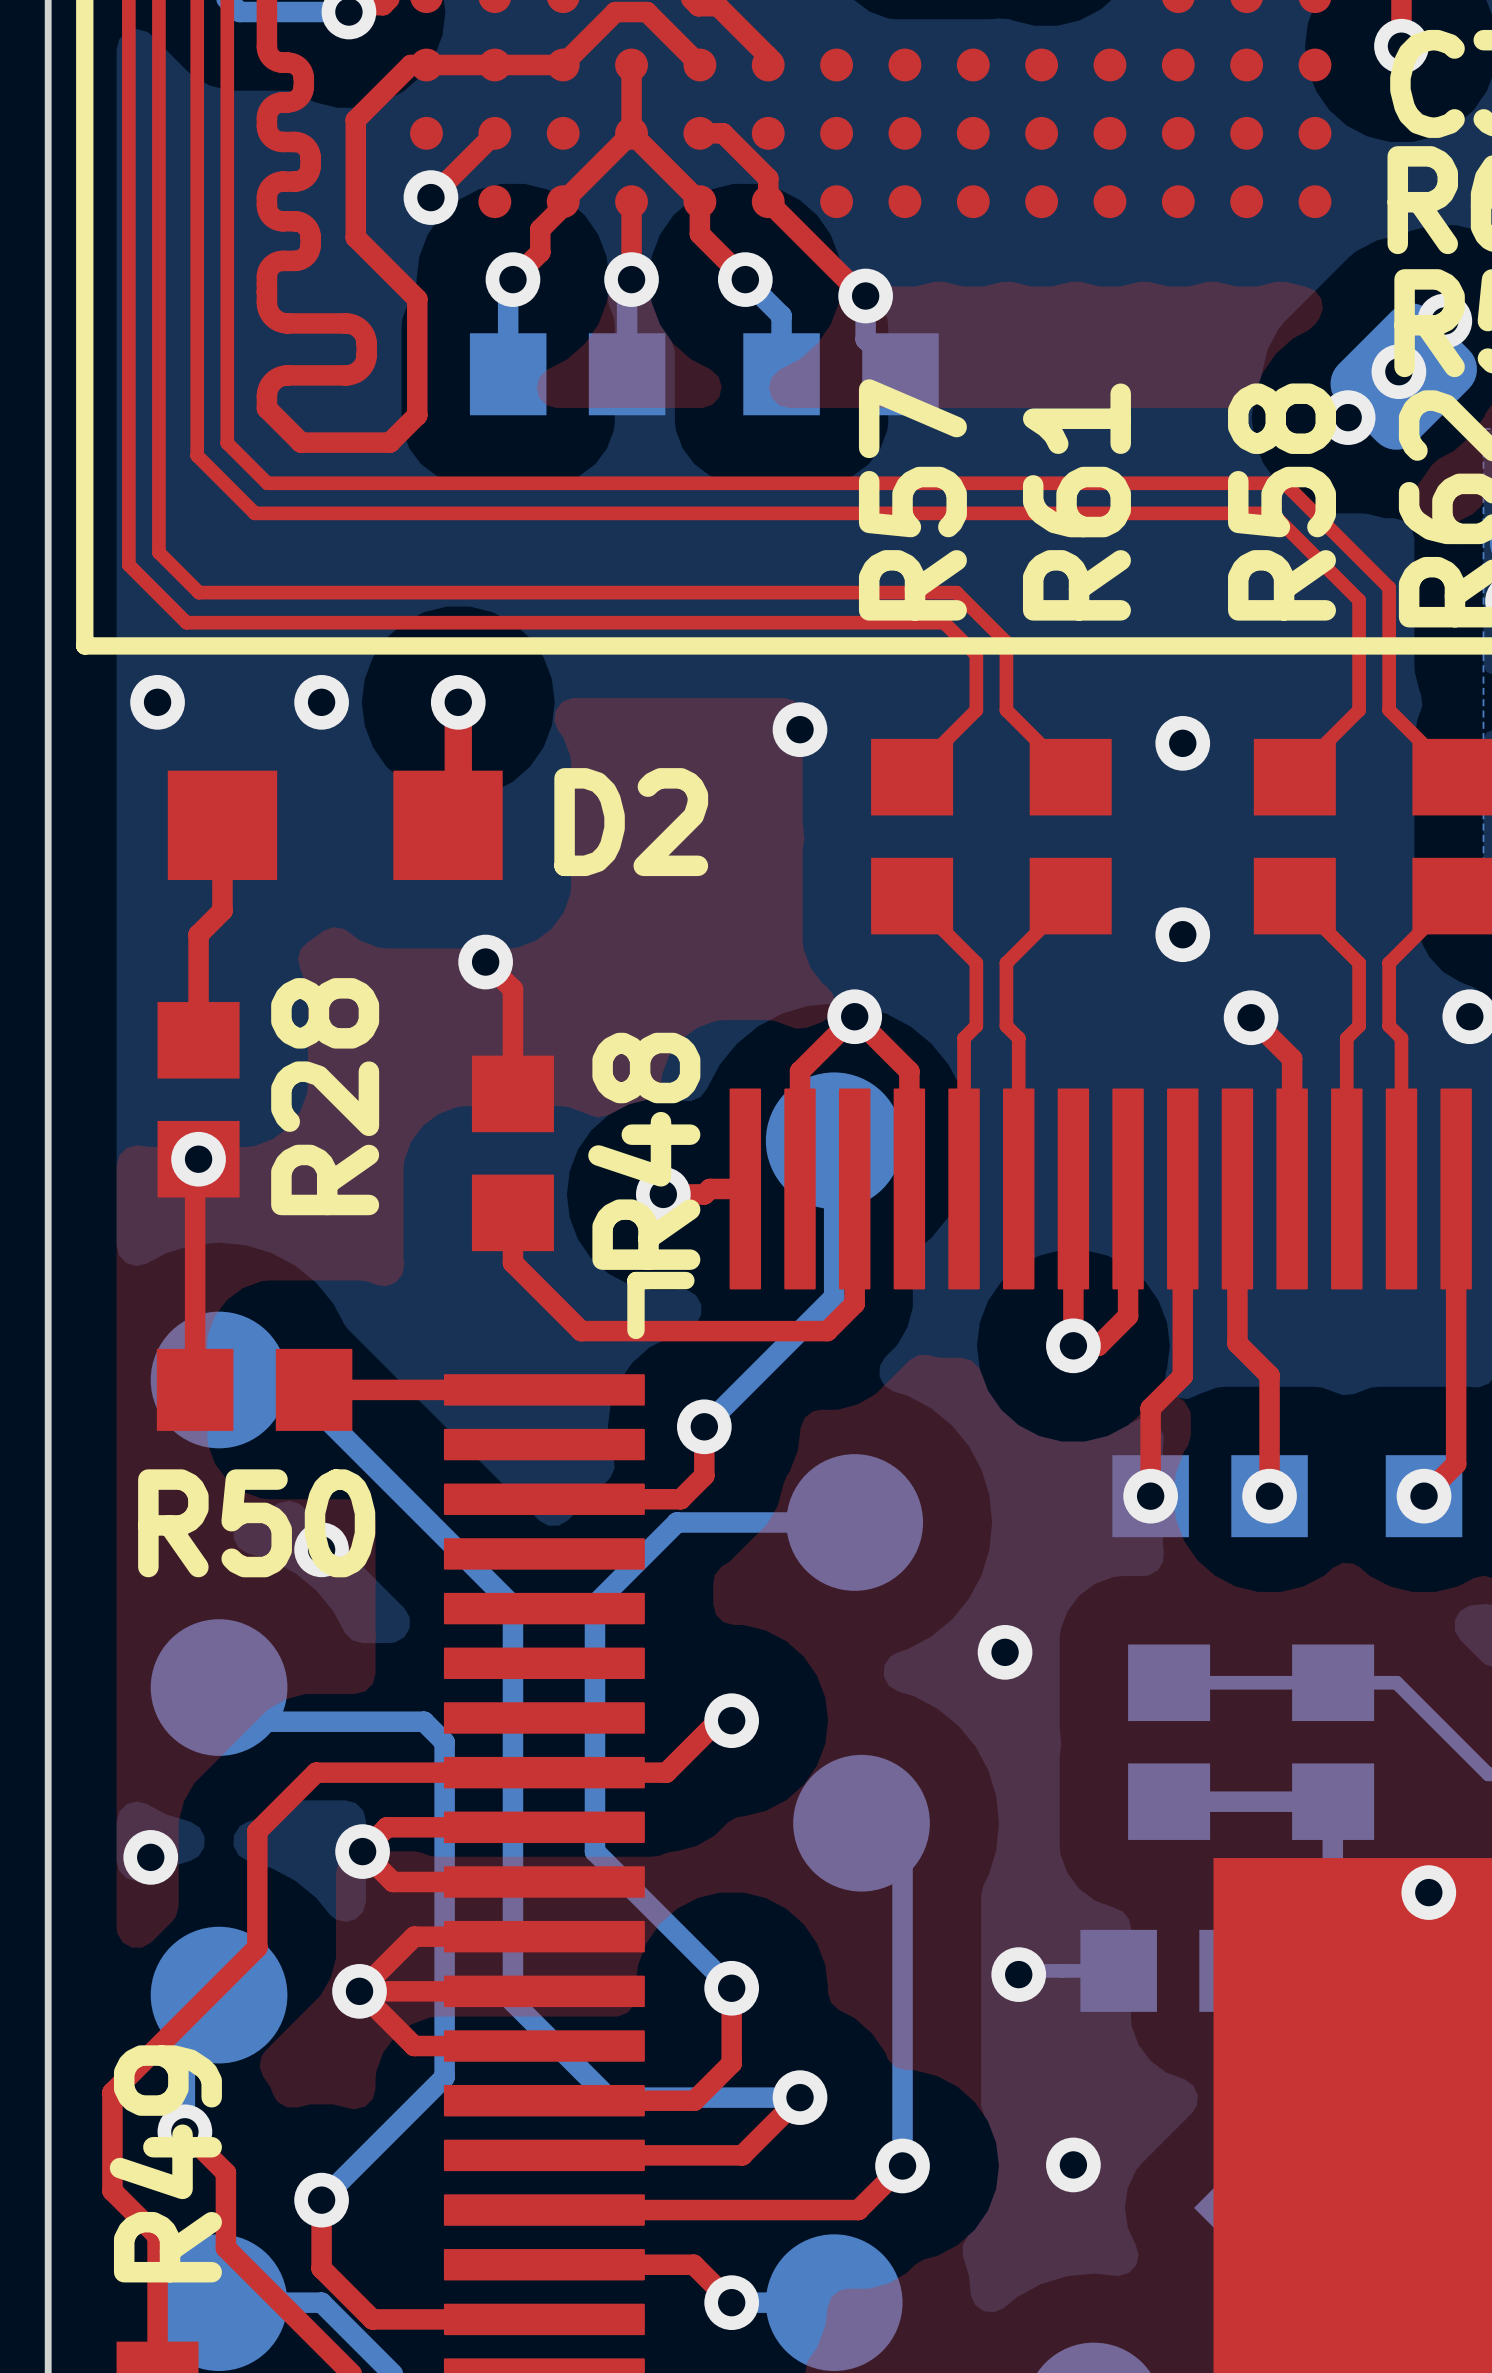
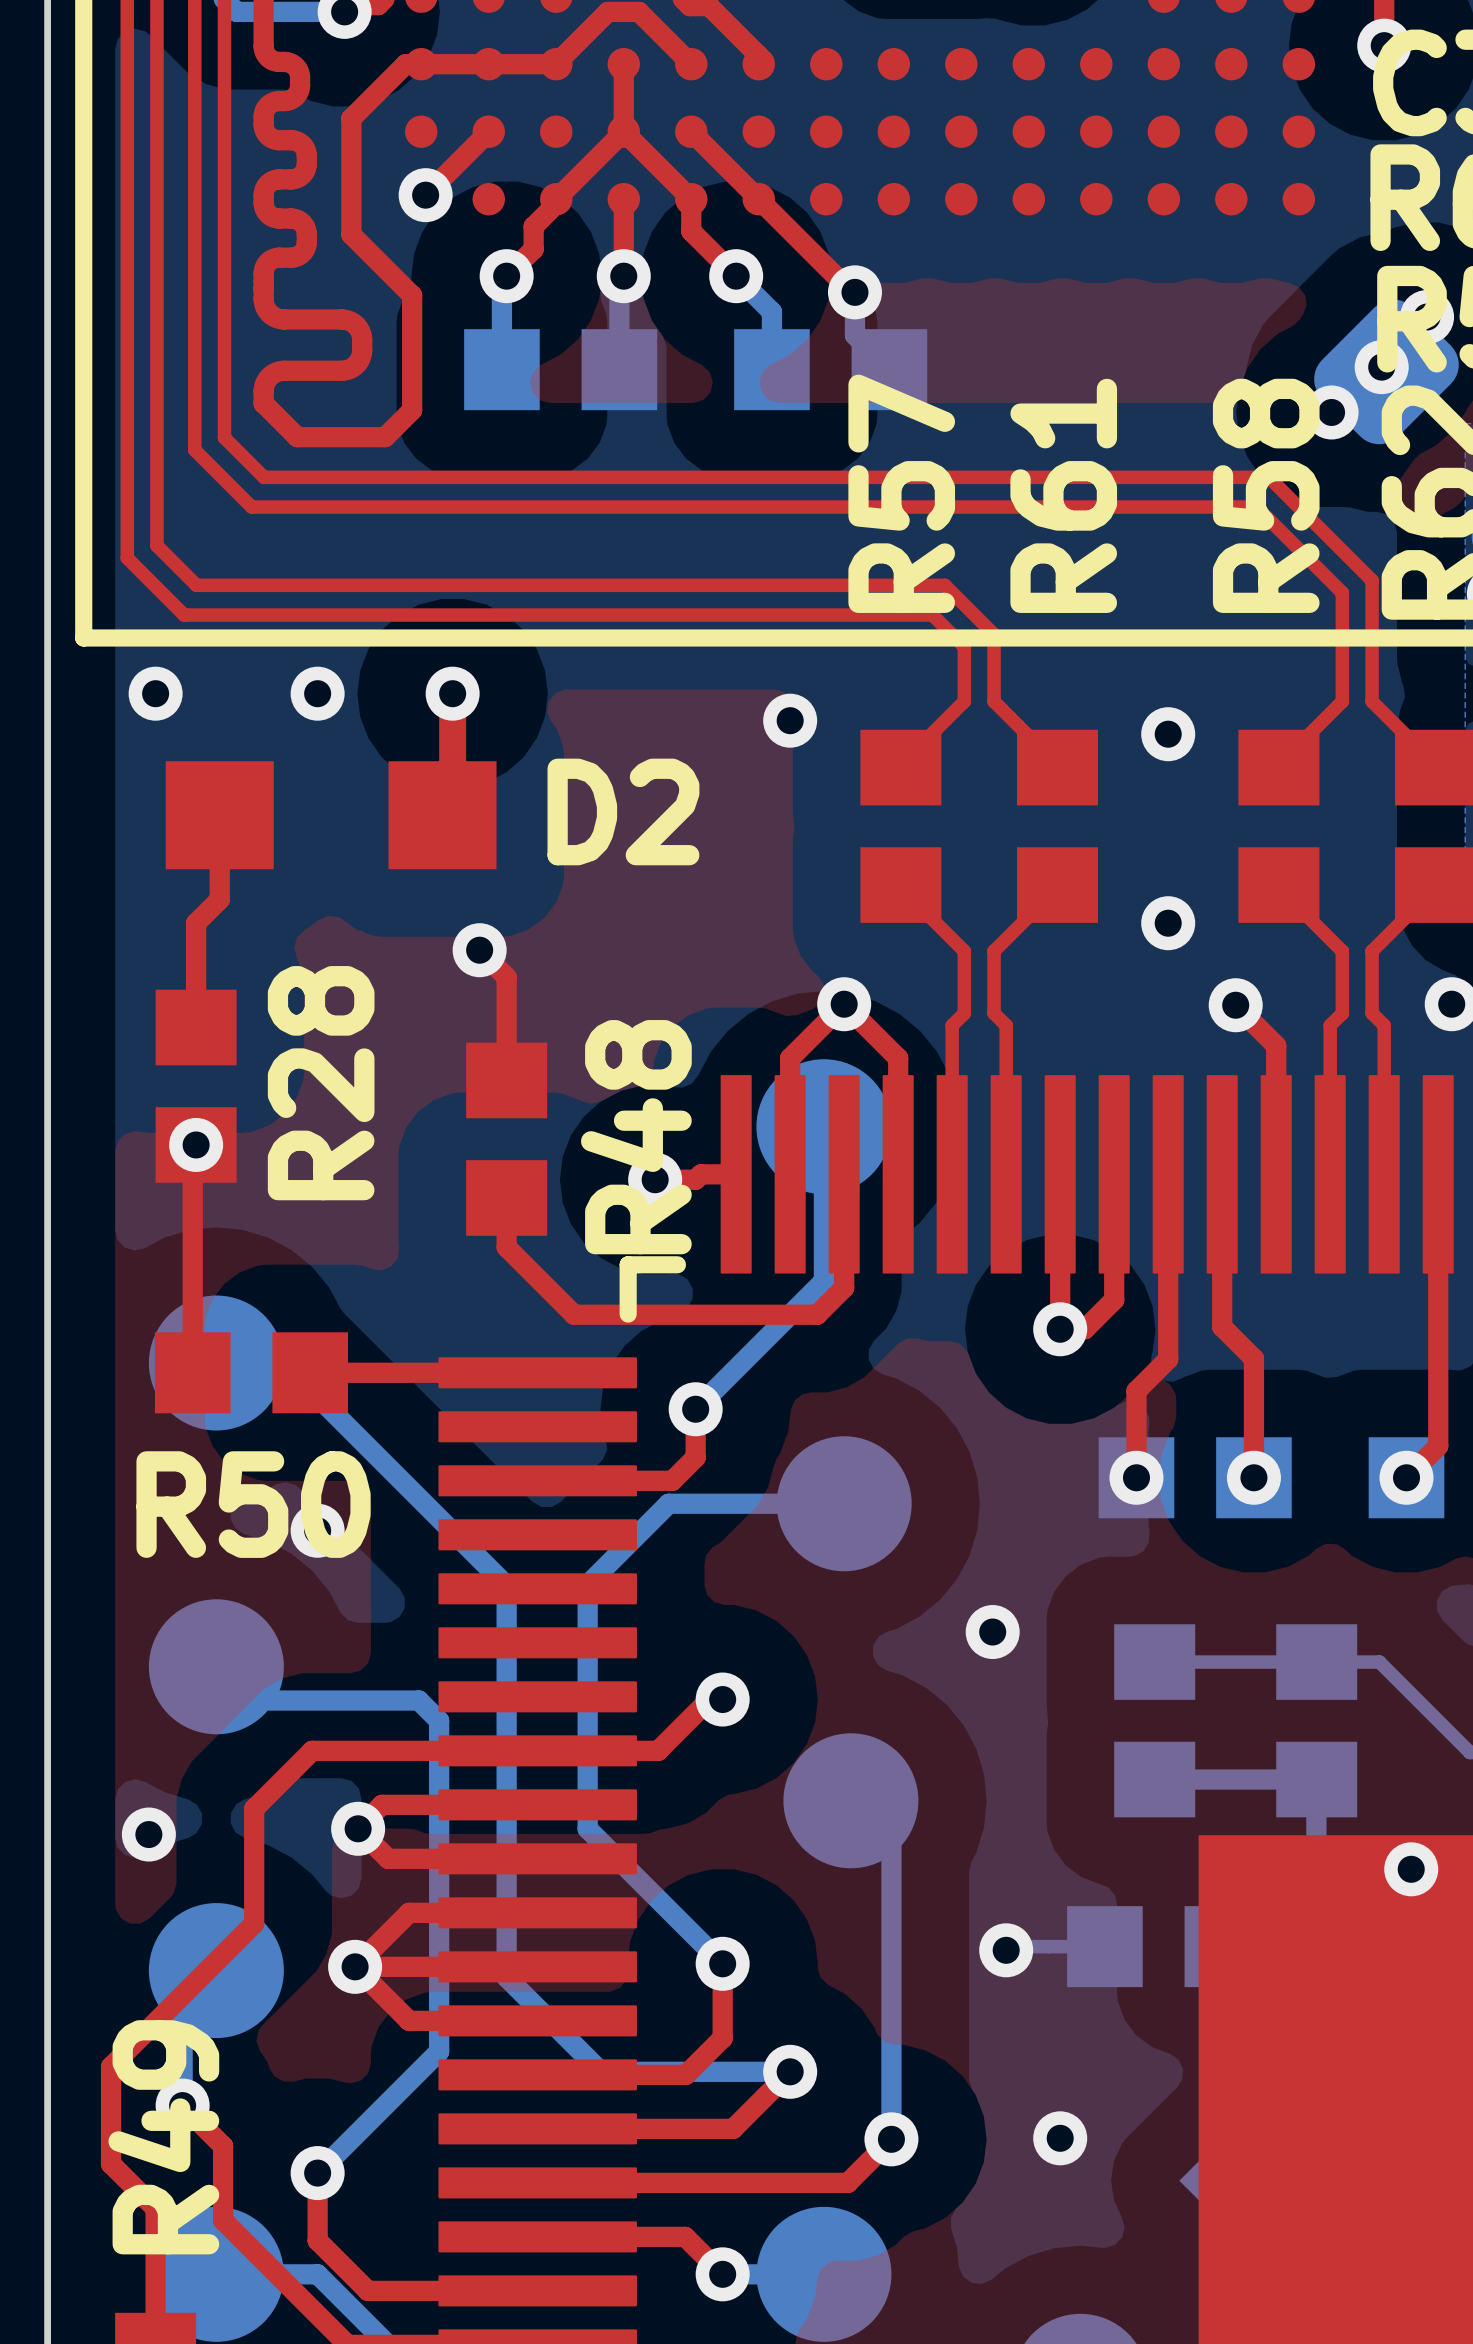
top track: (699, 133) (723, 133) (768, 178) (768, 201) -> (691, 131) (758, 199)

